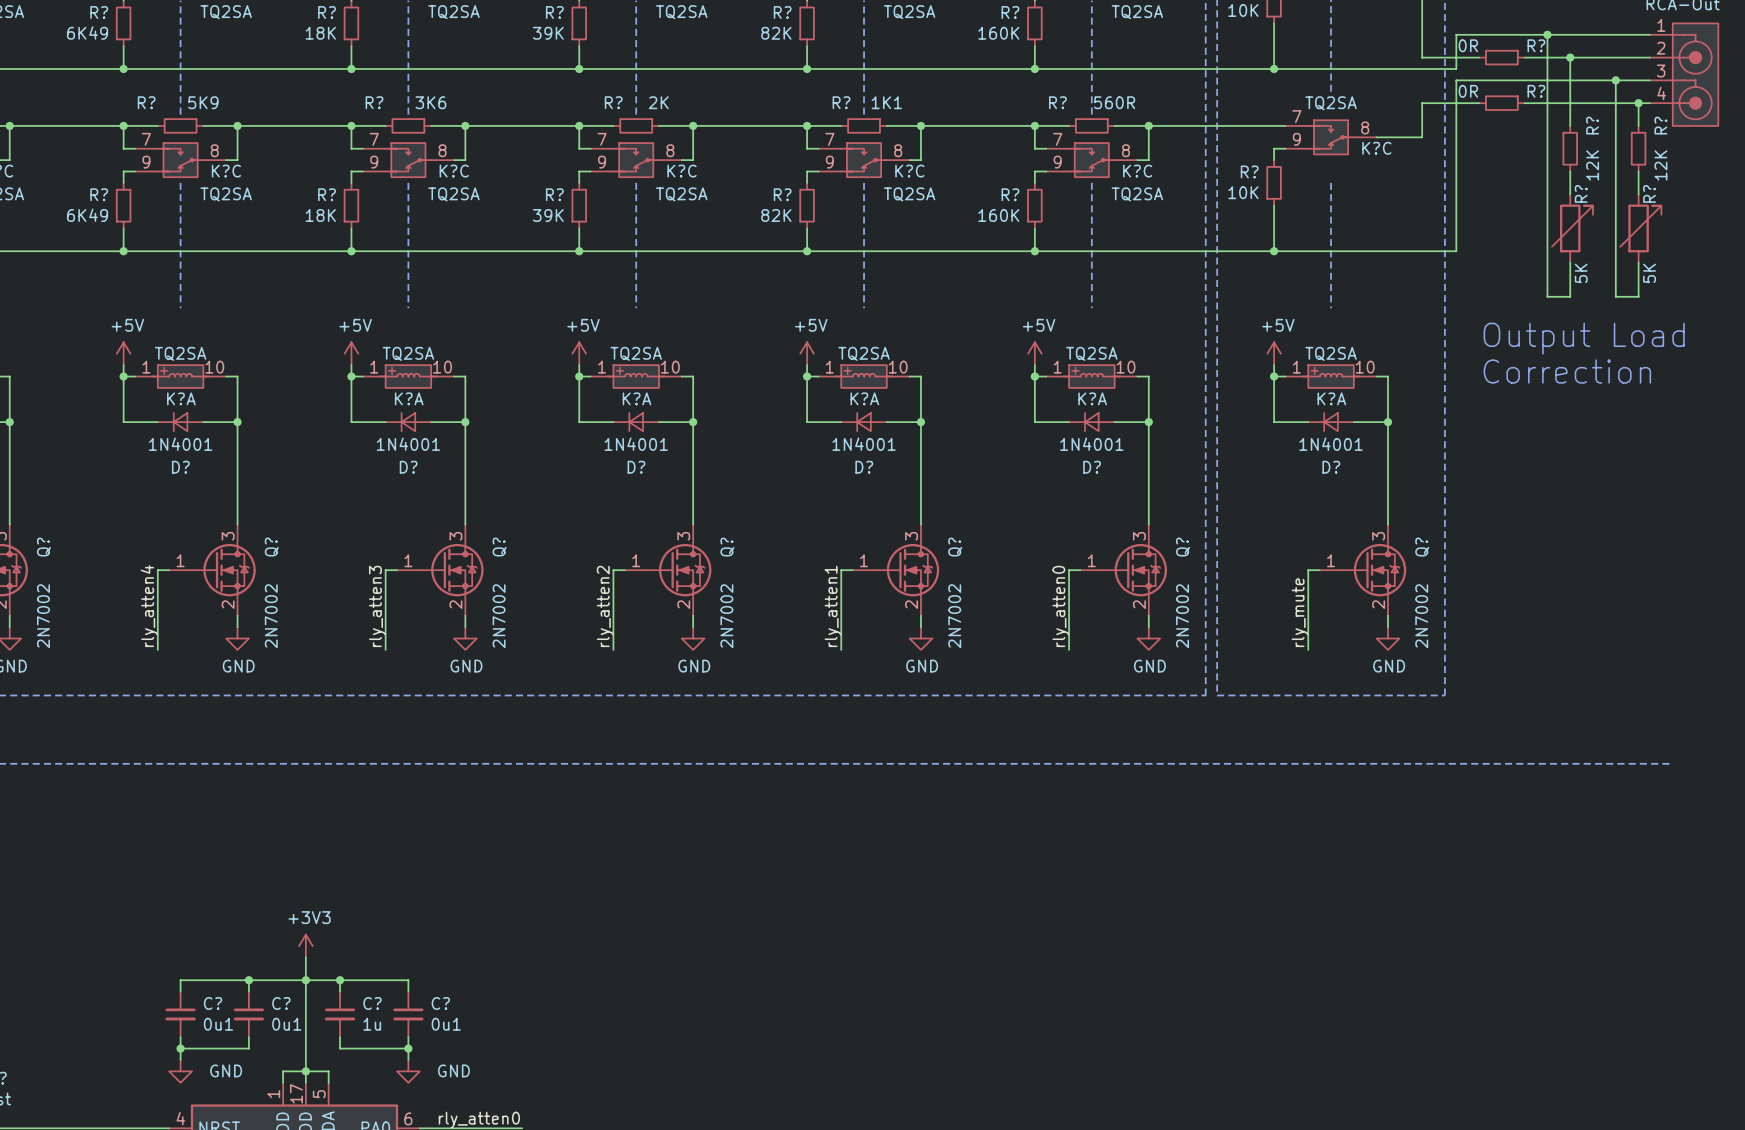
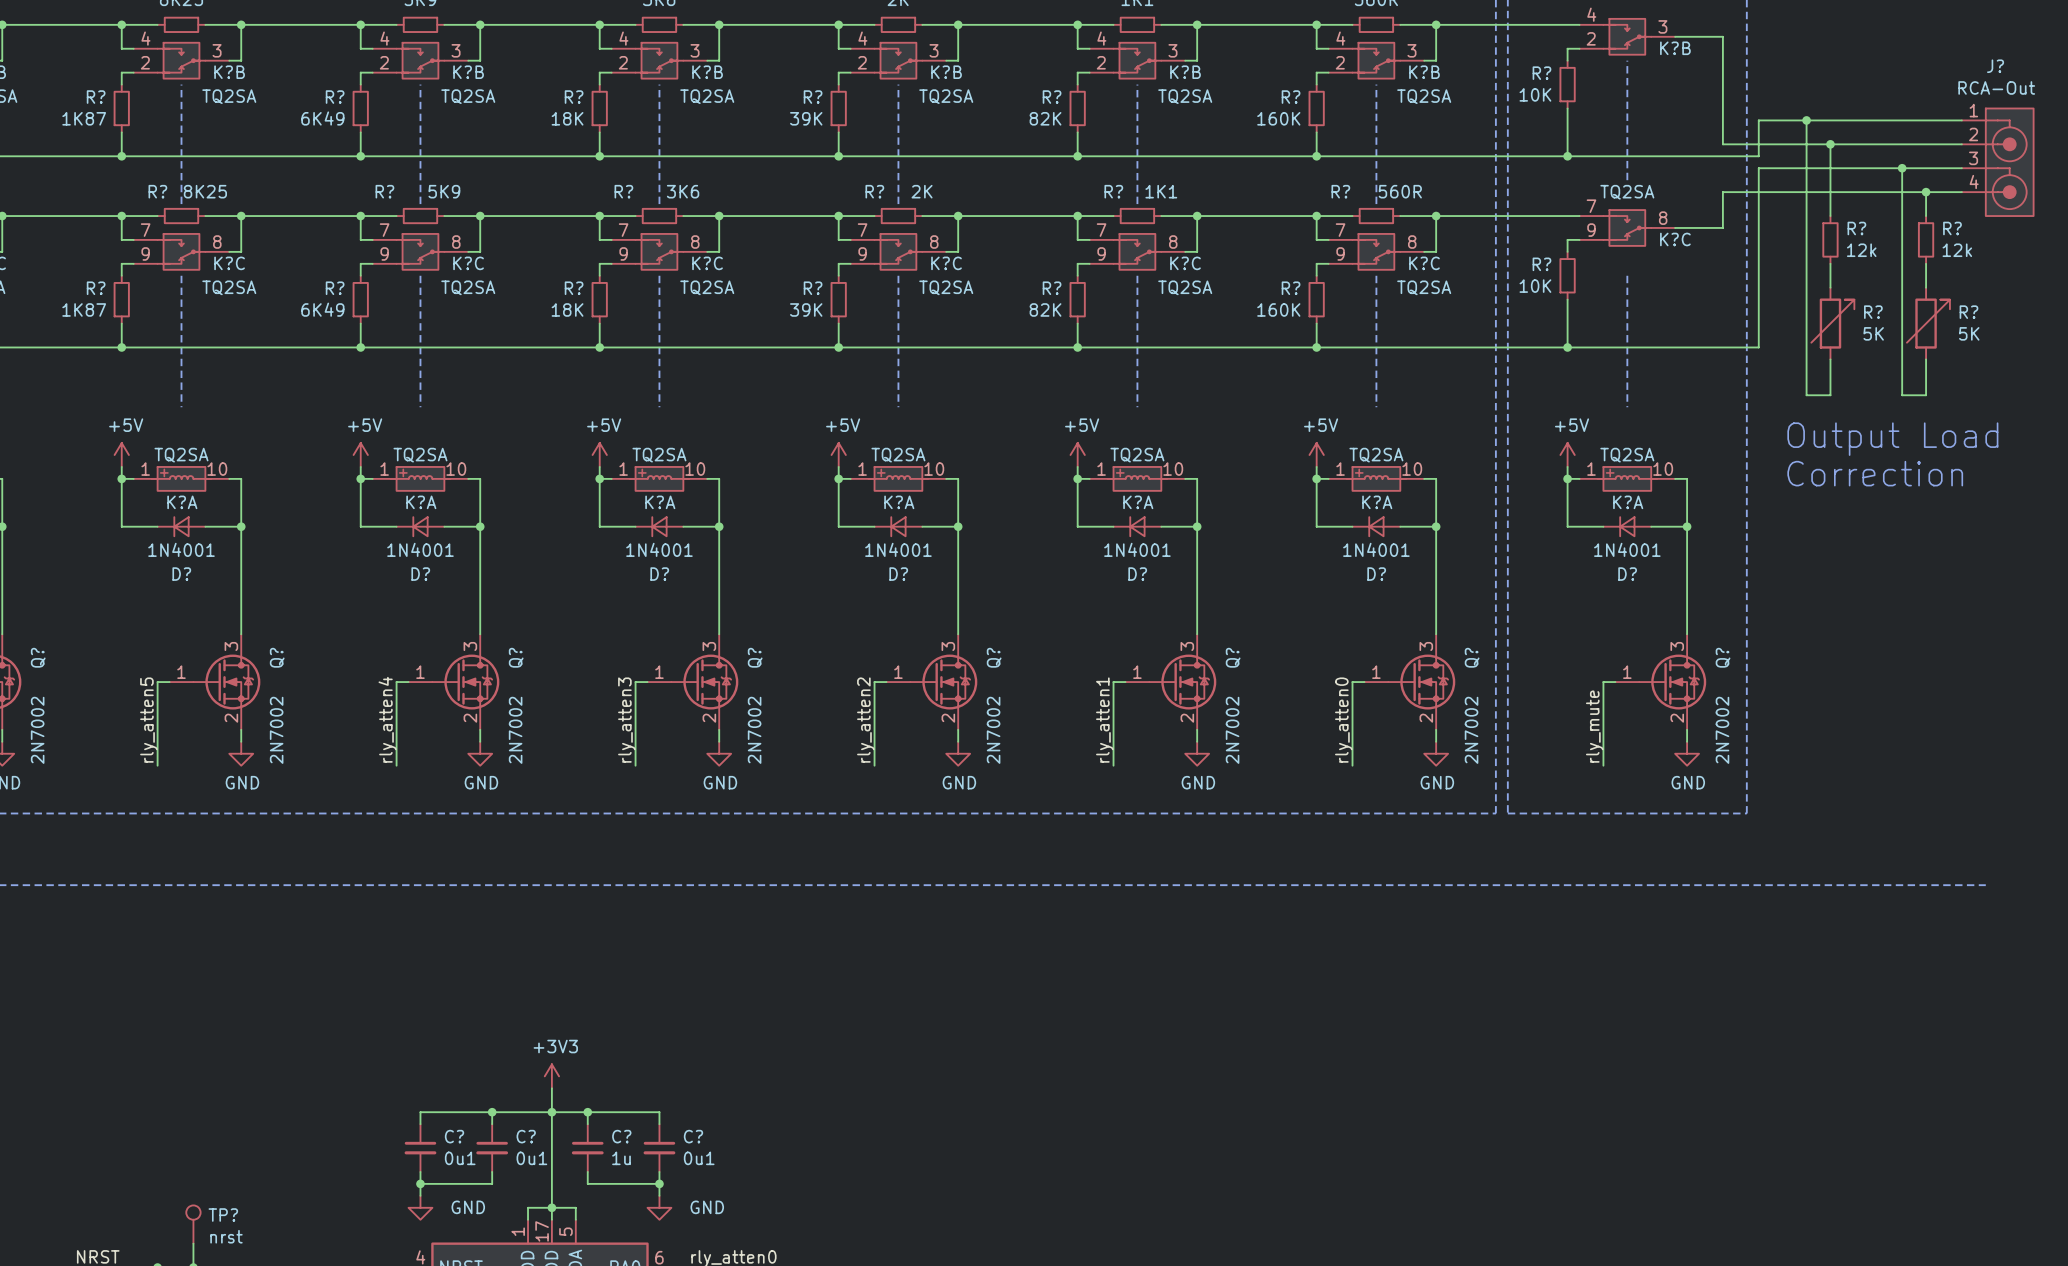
junction: none -> (1806, 120)
wire: (1547, 34) (1547, 296) (1570, 296) (1570, 262) -> (1806, 120) (1806, 395) (1830, 395) (1830, 359)
junction: (1547, 34) -> none
wire: none -> (1782, 144) (1830, 144) (1830, 216)
R?: 0R (1501, 57) -> none
junction: none -> (1830, 144)
wire: (1570, 57) (1570, 125) -> none
junction: (1570, 57) -> none
junction: none -> (1902, 168)
wire: (1615, 80) (1615, 103) -> none
junction: (1615, 80) -> none
wire: none -> (1782, 192) (1830, 192)
R?: 0R (1501, 103) -> none
junction: none -> (1926, 192)
wire: (1638, 103) (1638, 125) -> none
junction: (1638, 103) -> none
wire: (1615, 125) (1615, 171) -> none
R?: none -> 12k (1830, 239)
R?: 12K (1570, 148) -> none
R?: none -> 12k (1926, 239)
R?: 12K (1638, 148) -> none
wire: (1570, 171) (1570, 194) -> (1830, 263) (1830, 287)
wire: (1638, 171) (1638, 194) -> none
wire: (1615, 194) (1615, 262) -> none
R?: none -> 5K (1832, 323)
R?: 5K (1572, 228) -> none
R?: none -> 5K (1928, 323)
R?: 5K (1640, 228) -> none
wire: (1638, 262) (1638, 296) (1615, 296) -> (1902, 168) (1902, 395) (1926, 395)

